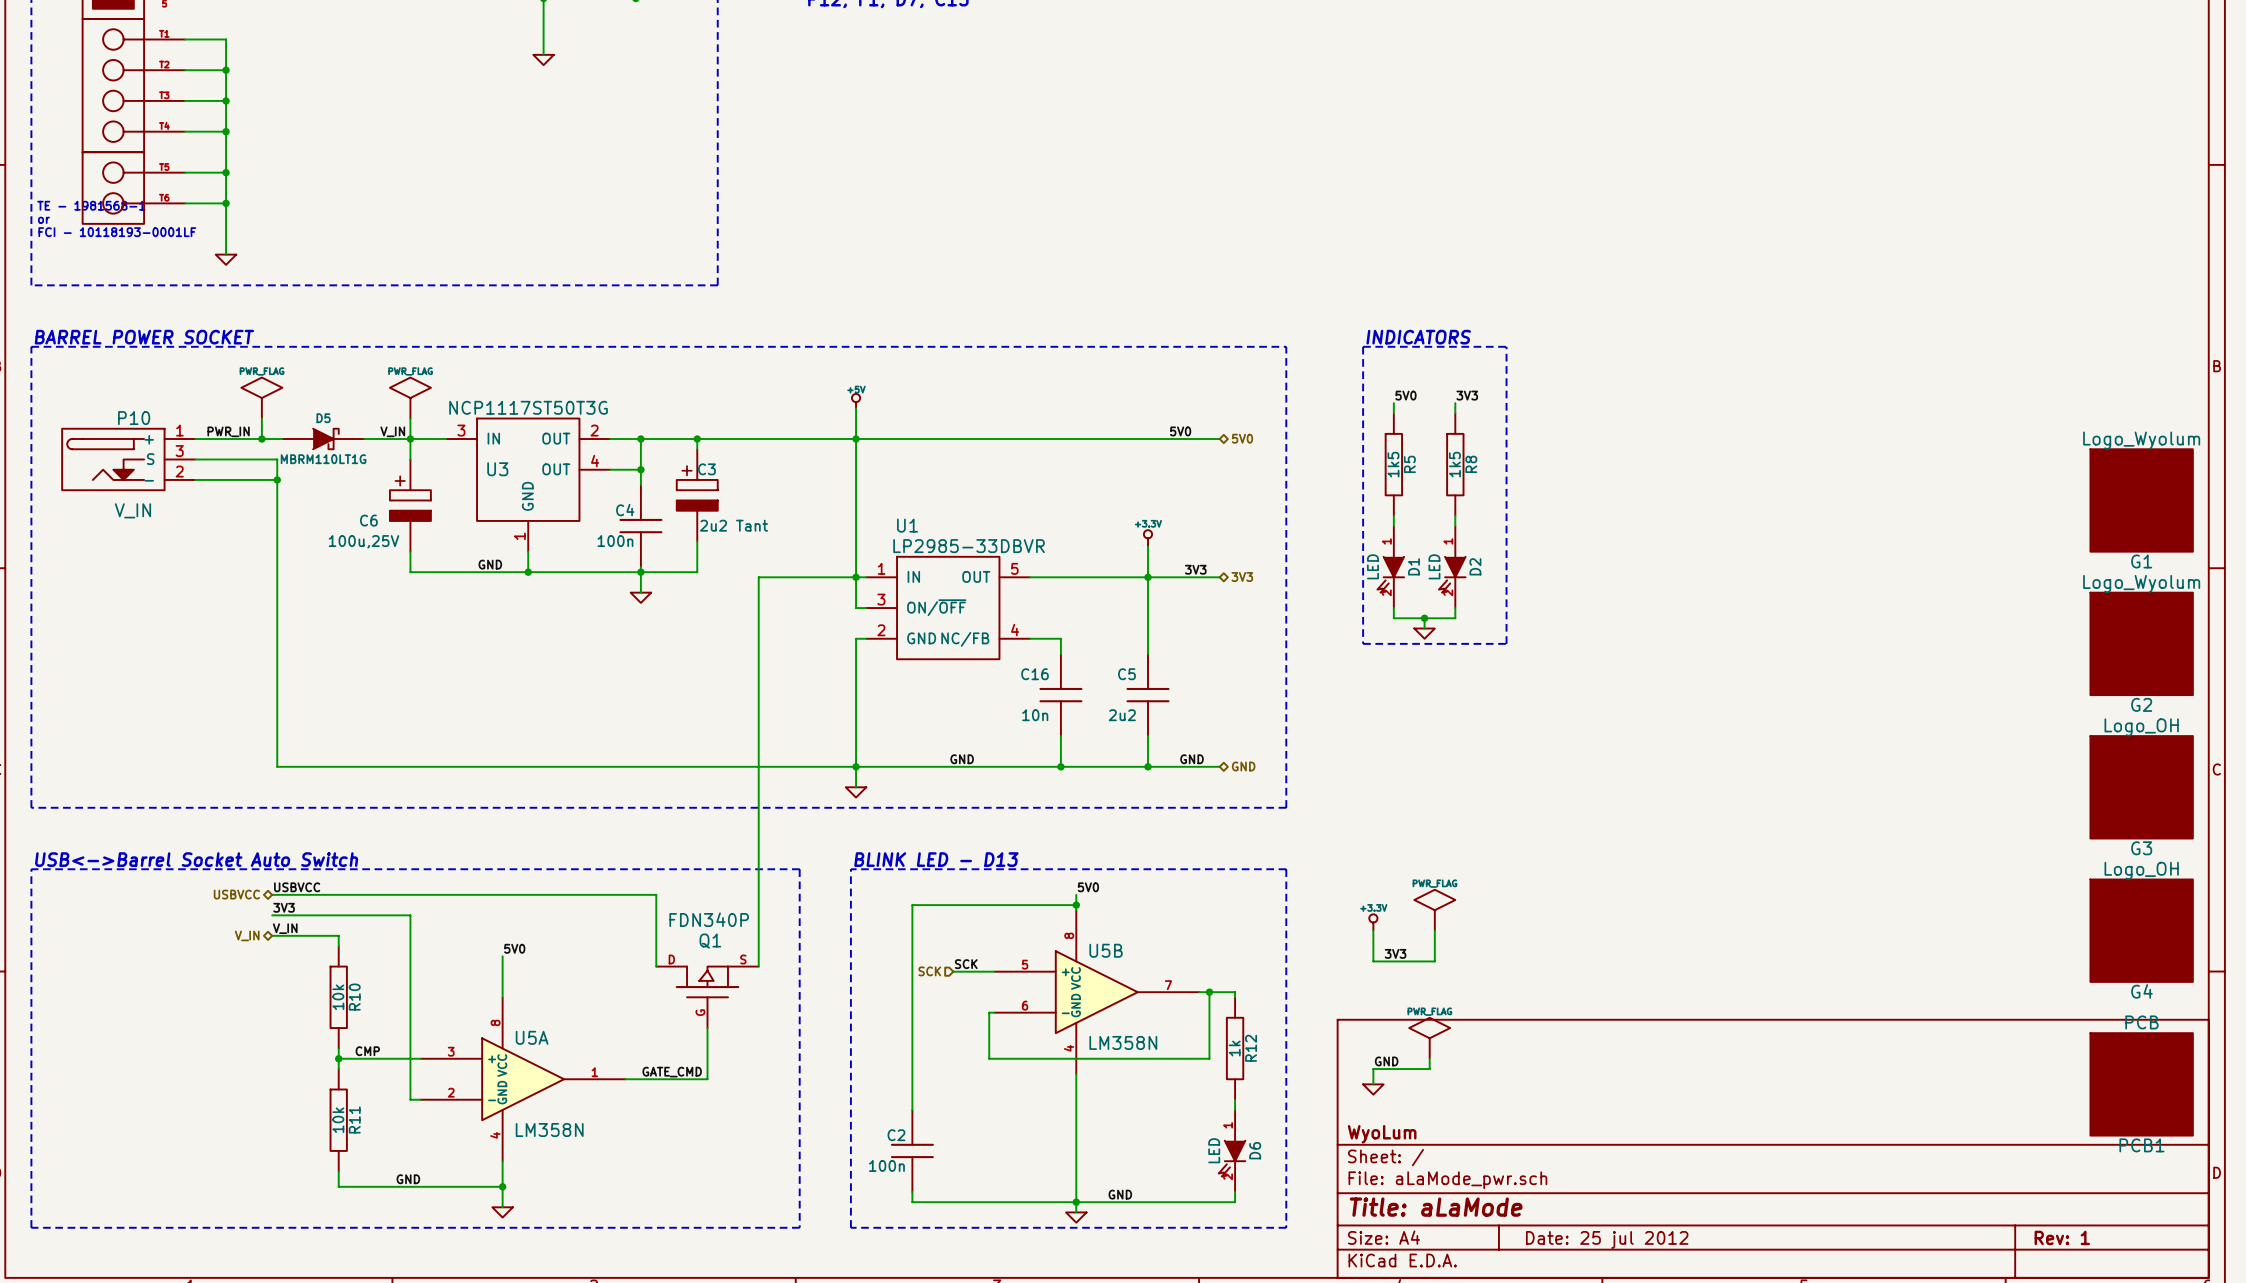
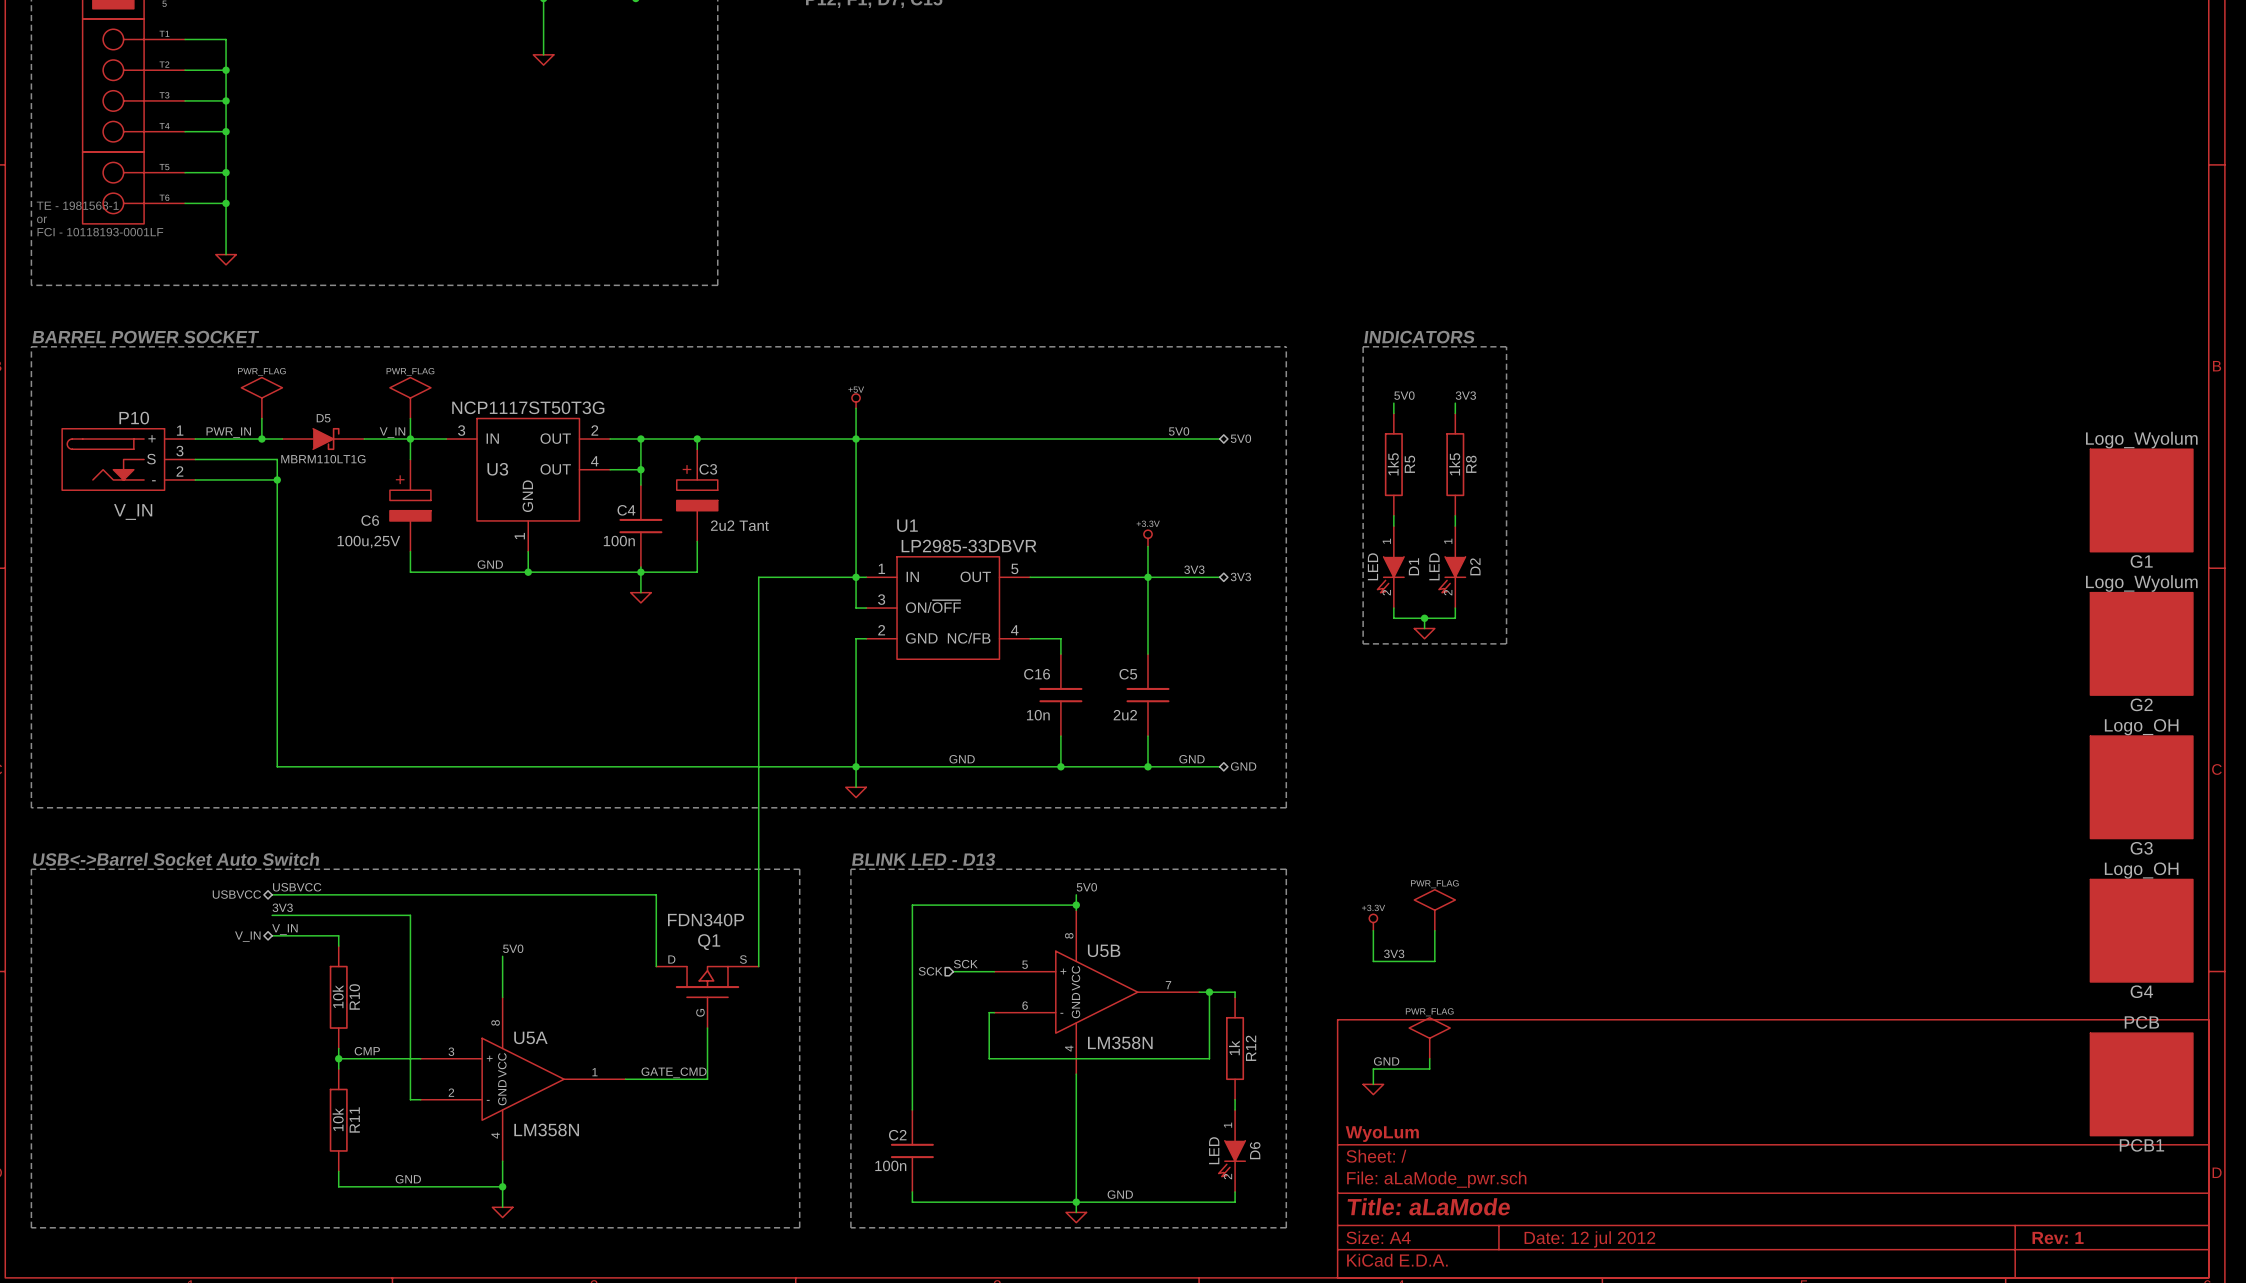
title block: Date: 25 jul 2012 (1607, 1239) -> Date: 12 jul 2012 (1589, 1239)

